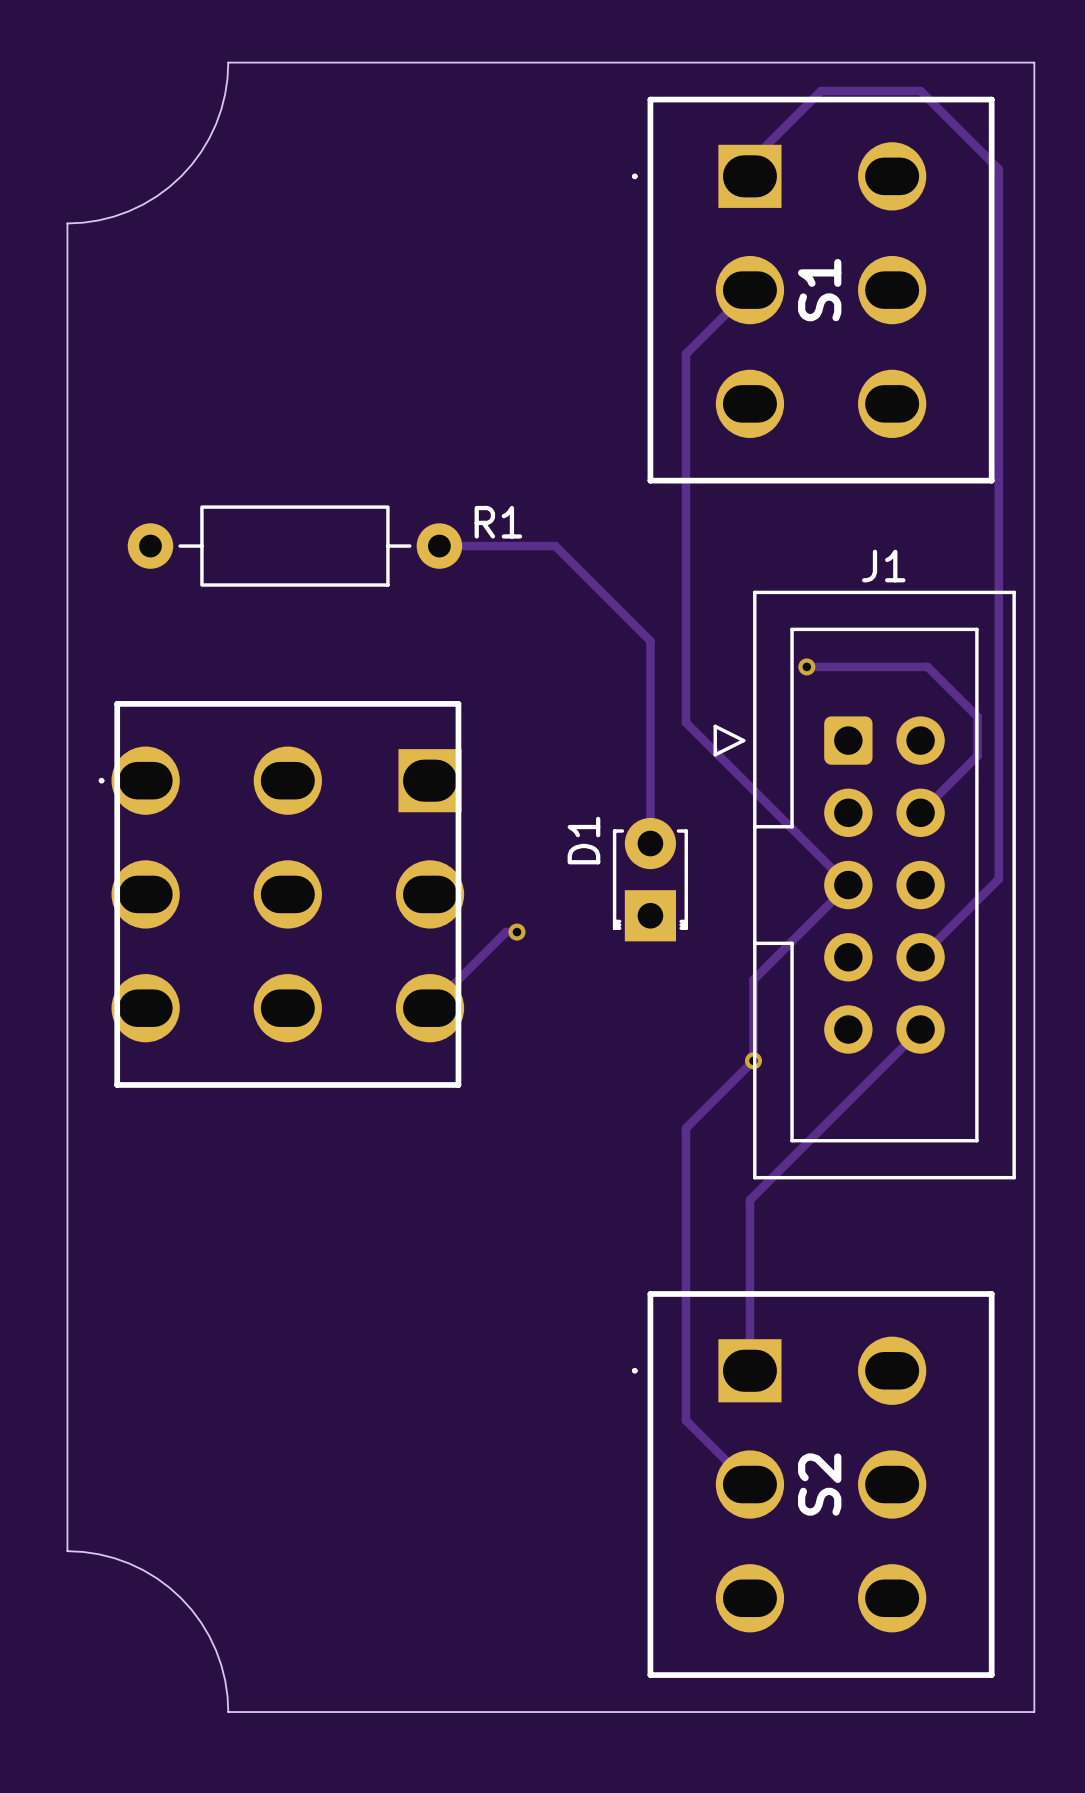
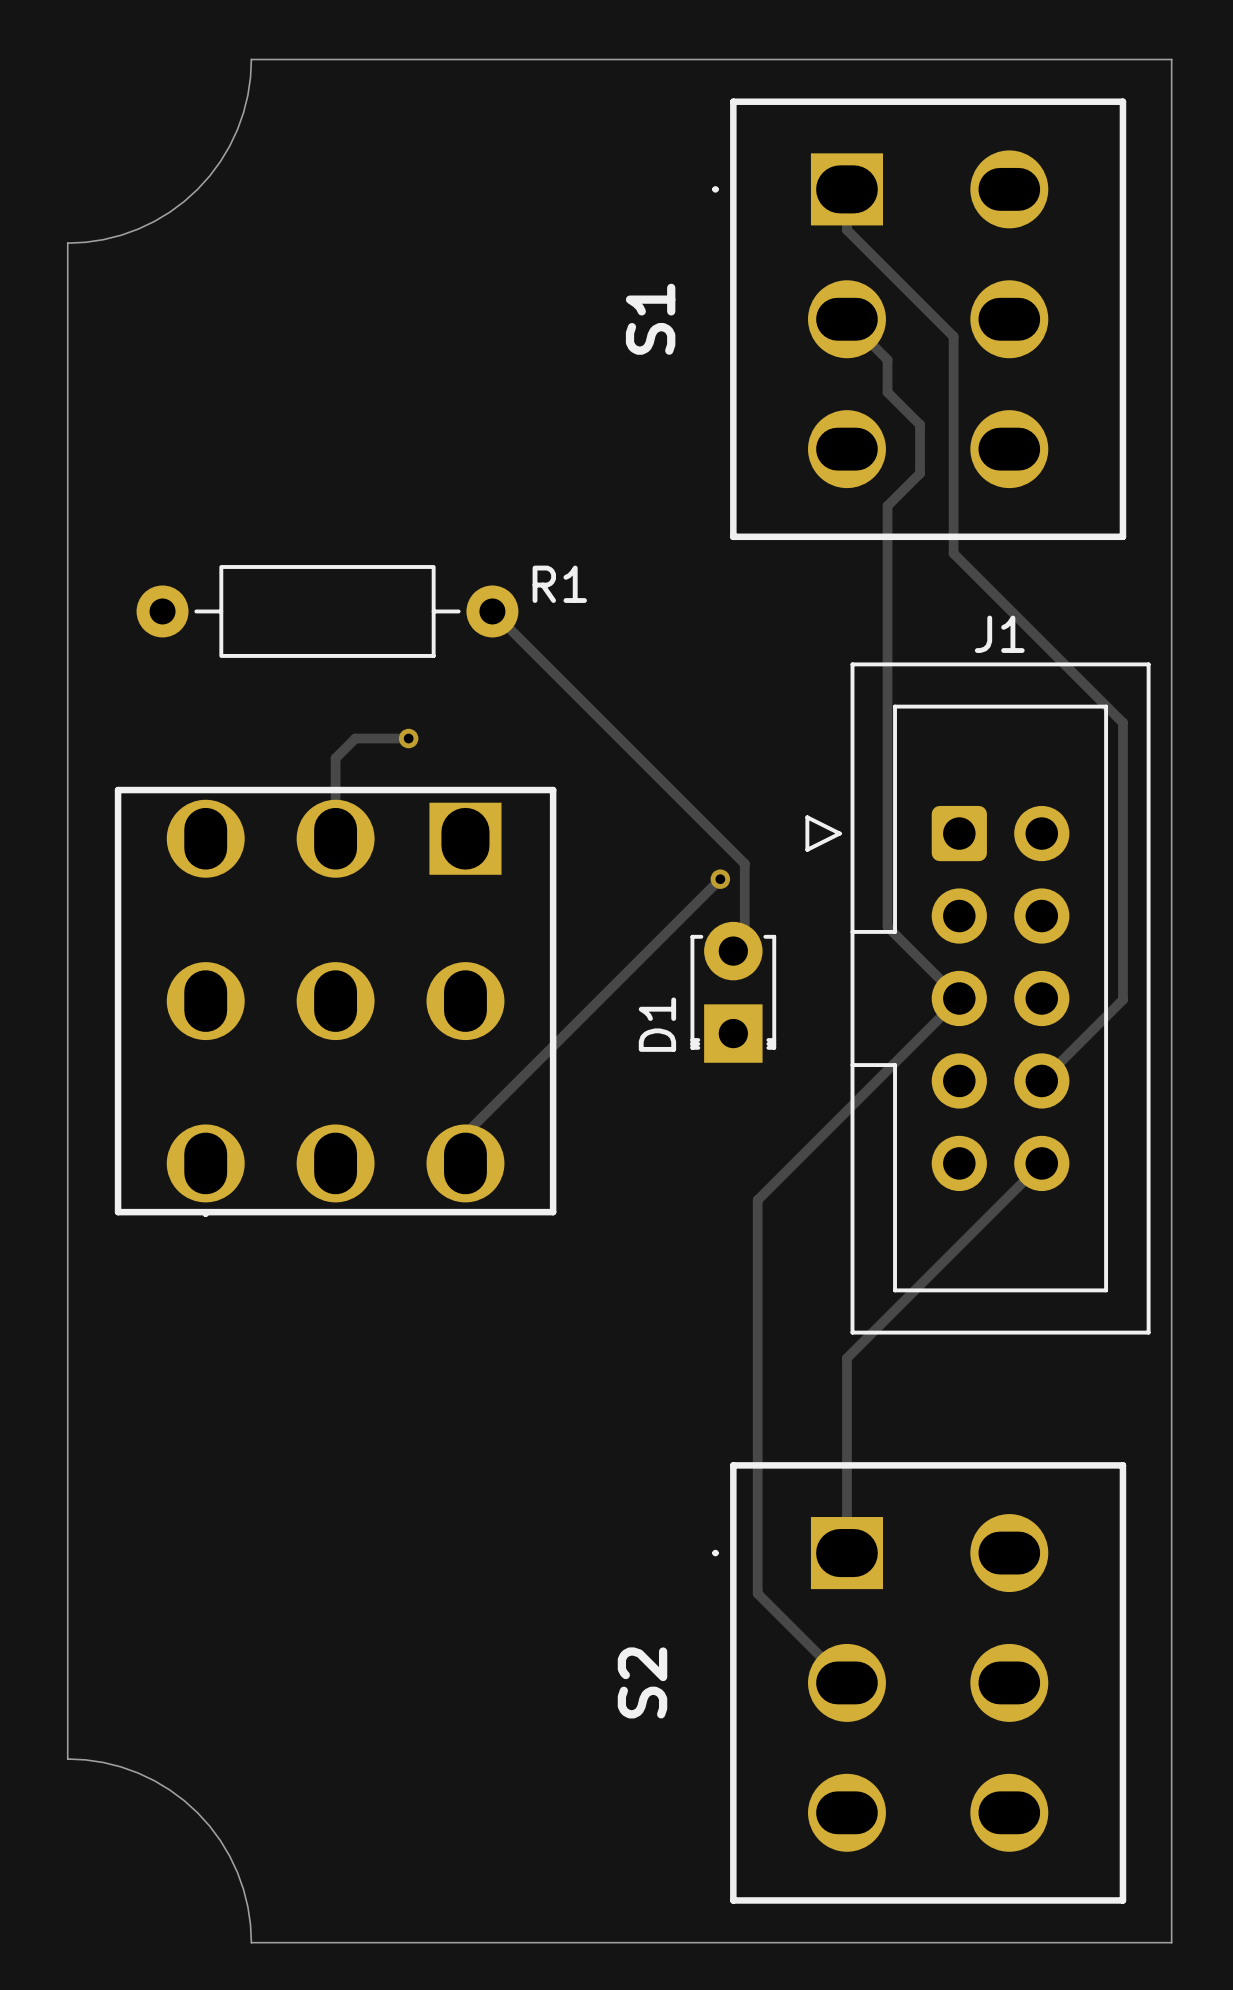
track: (749, 176) (749, 162) (821, 91) (920, 91) (998, 169) (998, 879) (991, 886) -> (846, 189) (846, 229) (953, 336) (953, 553) (1122, 722) (1122, 999)
track: (749, 290) (685, 354) (685, 722) (785, 822) -> (846, 319) (887, 359) (887, 392) (920, 424) (920, 473) (887, 505) (887, 926)
S1 name position: S1 (819, 290) -> S1 (650, 319)
track: (439, 546) (555, 546) (650, 641) (650, 843) -> (492, 611) (744, 863) (744, 939) (733, 951)
track: none -> (408, 738) (355, 738) (335, 758) (335, 838)
via: none -> (408, 738)
track: (806, 666) (927, 666) (977, 716) (977, 755) (920, 812) -> none
via: (806, 666) -> none
part footprint: [98, 701, 465, 1088] -> [114, 786, 557, 1218]
track: none -> (720, 879) (465, 1134) (465, 1163)
via: none -> (720, 879)
D1 name position: D1 (583, 840) -> D1 (657, 1024)
via: (516, 932) -> none
track: (514, 934) (516, 932) (506, 932) (430, 1008) -> none
track: (753, 979) (753, 1060) (685, 1128) (685, 1420) -> (851, 1106) (757, 1200) (757, 1593) (773, 1609)
via: (753, 1060) -> none
S2 name position: S2 (819, 1484) -> S2 (642, 1682)

